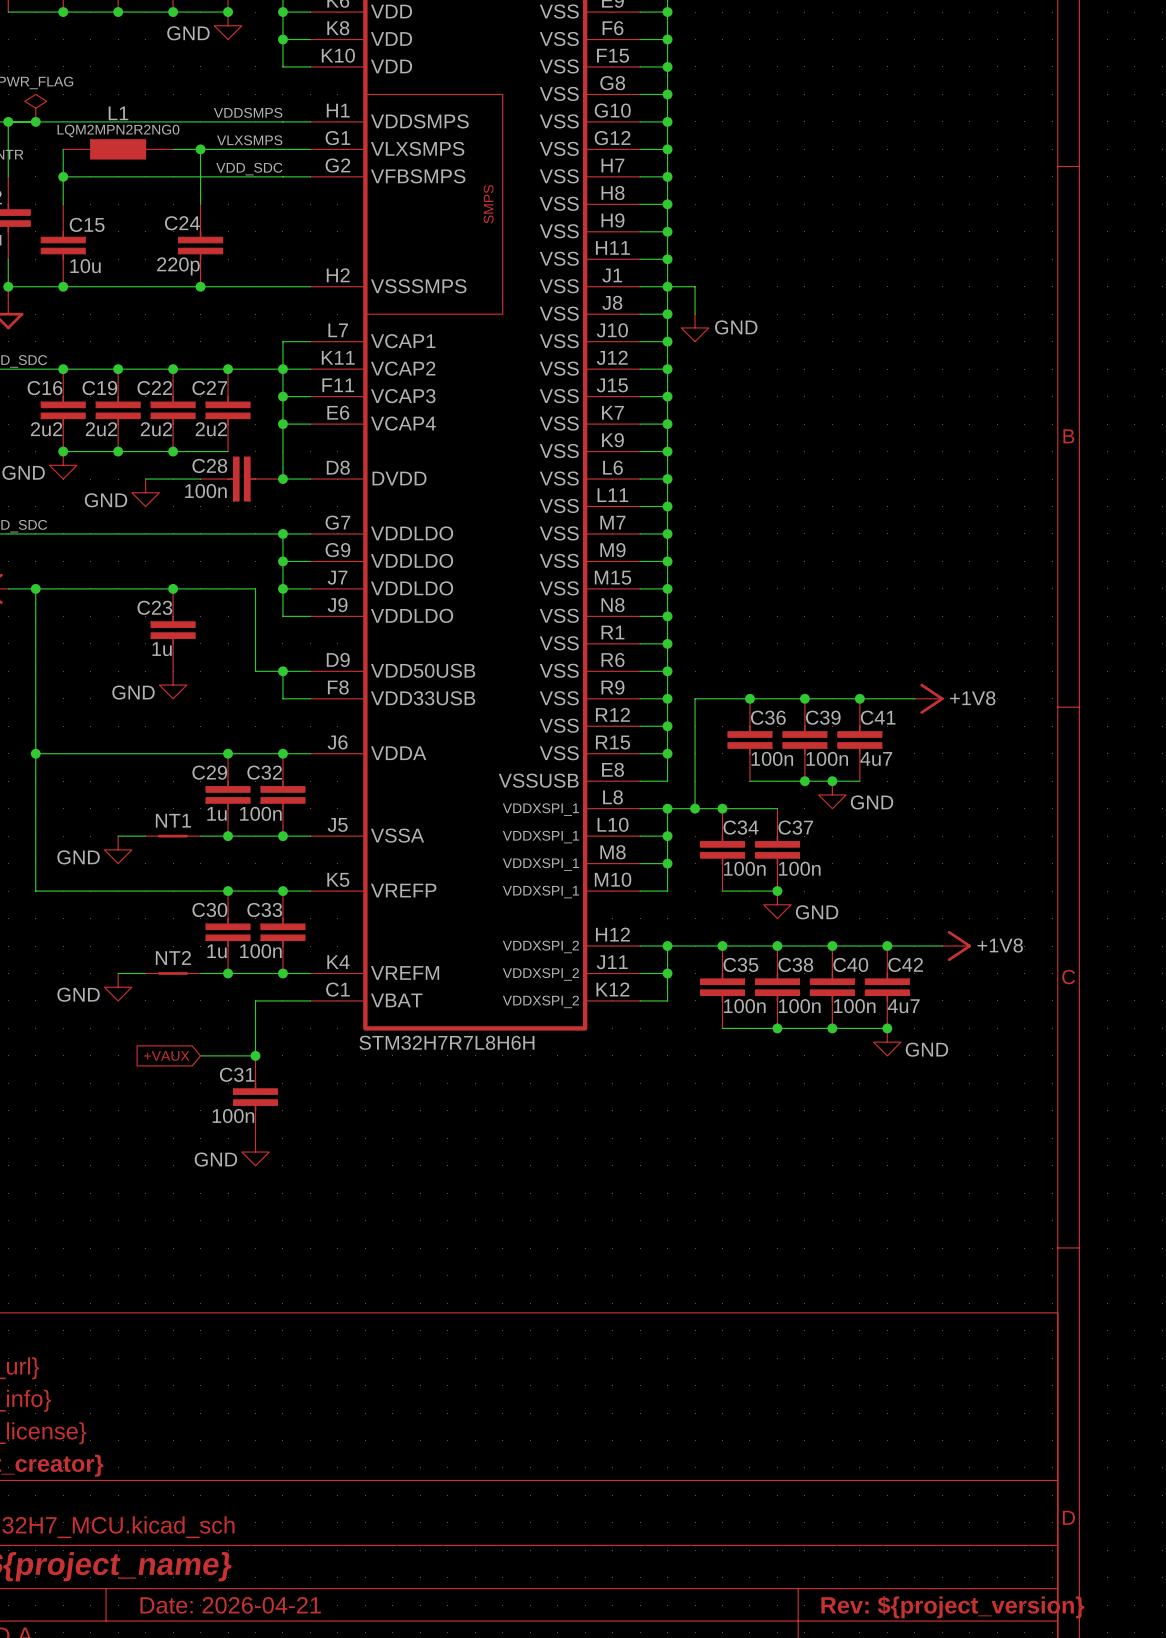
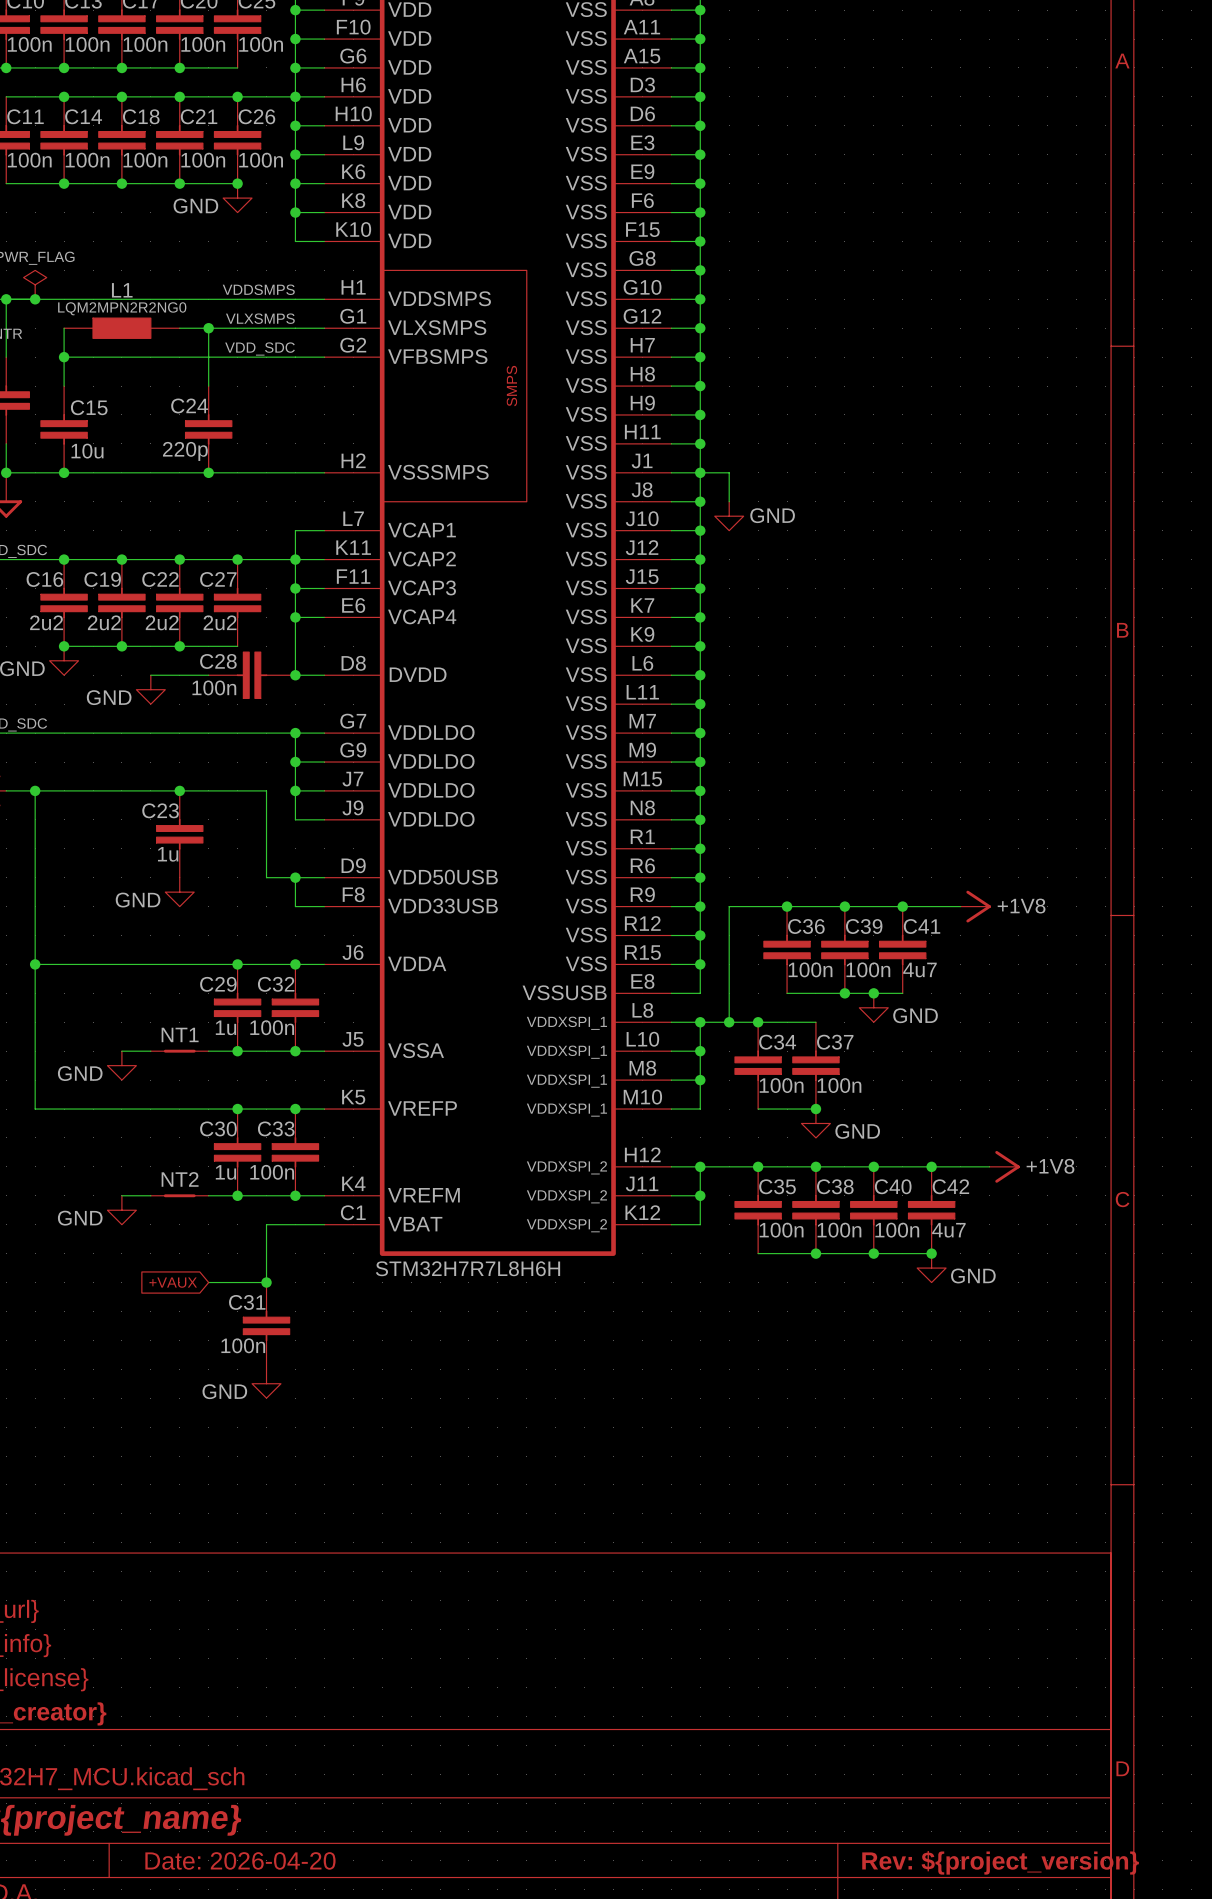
title block: Date: 2026-04-21 (230, 1605) -> Date: 2026-04-20 (240, 1860)

